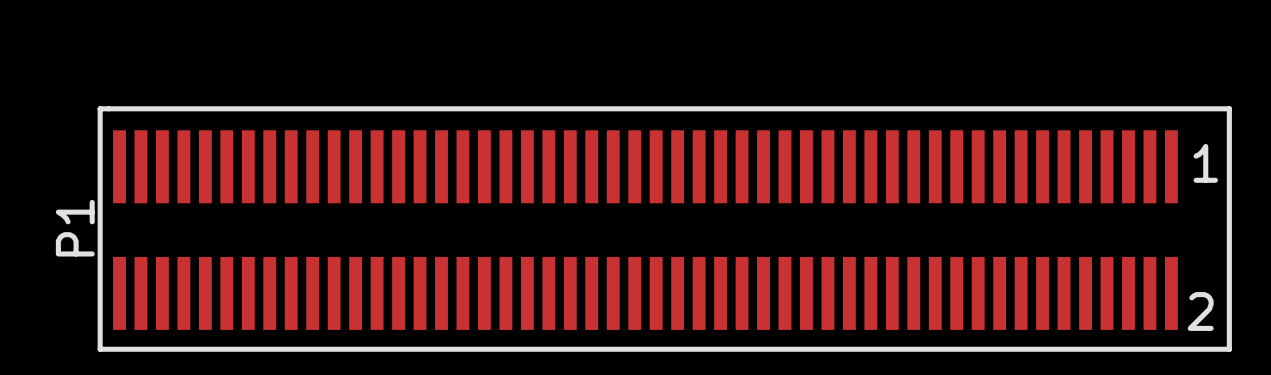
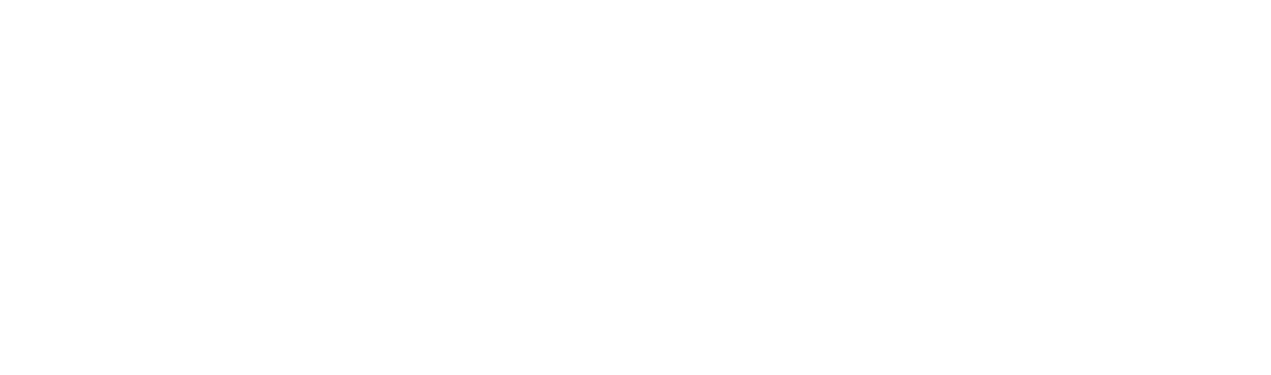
P1: (664, 229) -> none

